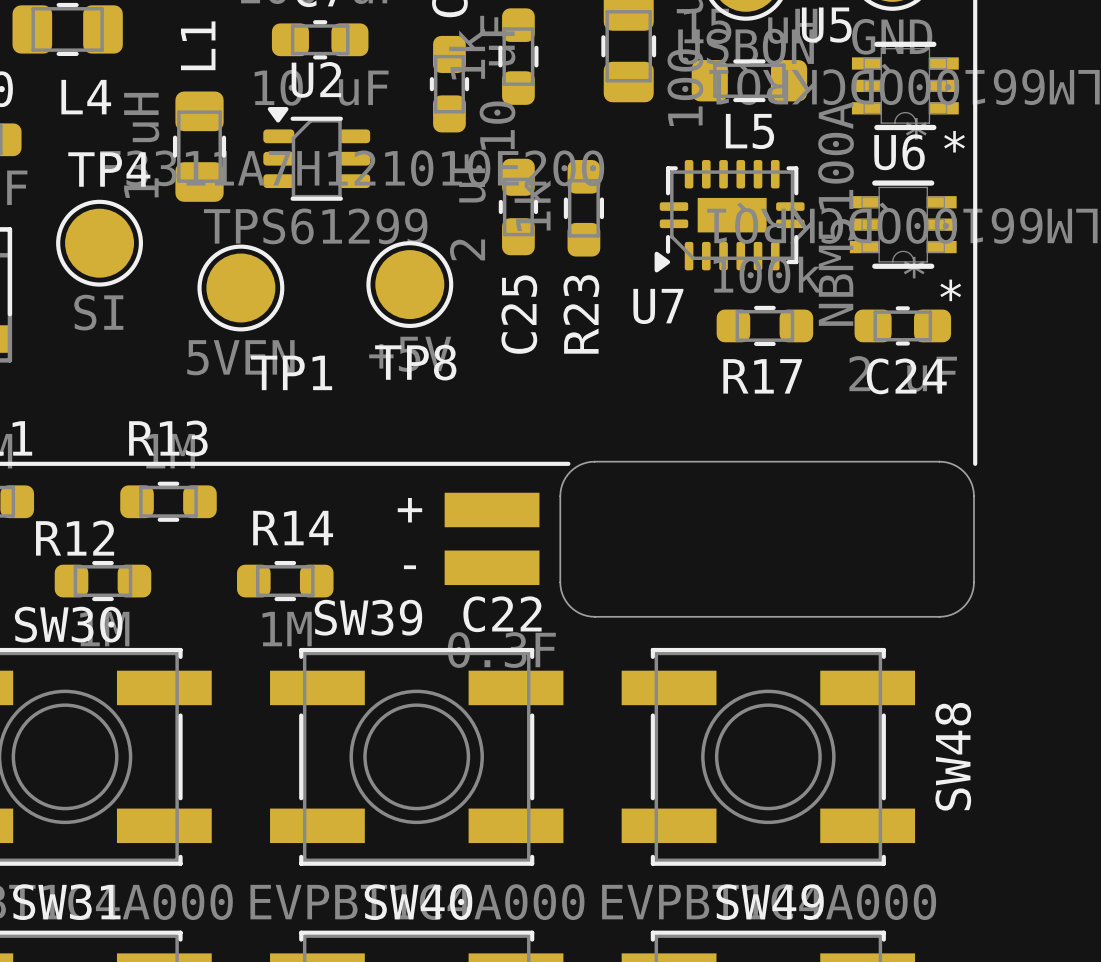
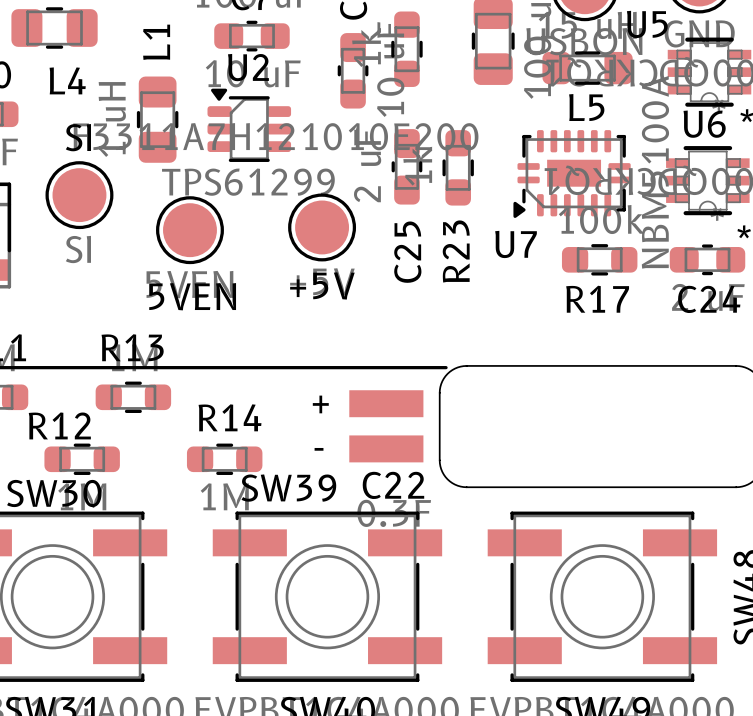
TP4 name: TP4 (109, 169) -> SI (78, 137)
TP8 name: TP8 (415, 362) -> +5V (322, 285)
TP1 name: TP1 (291, 372) -> 5VEN (192, 296)

